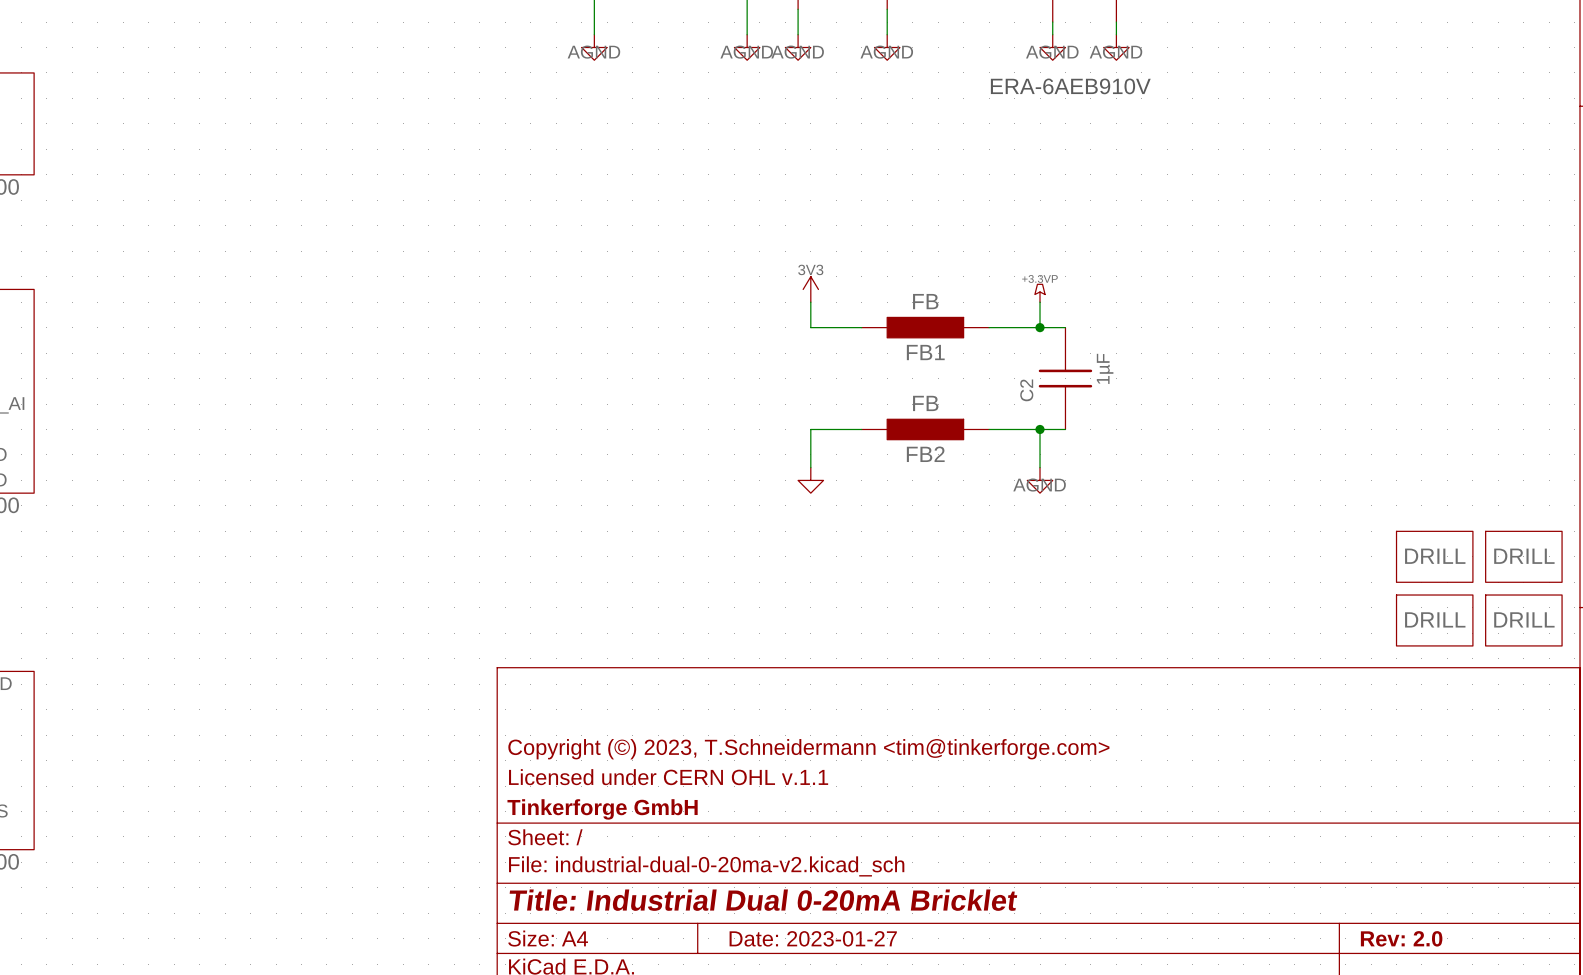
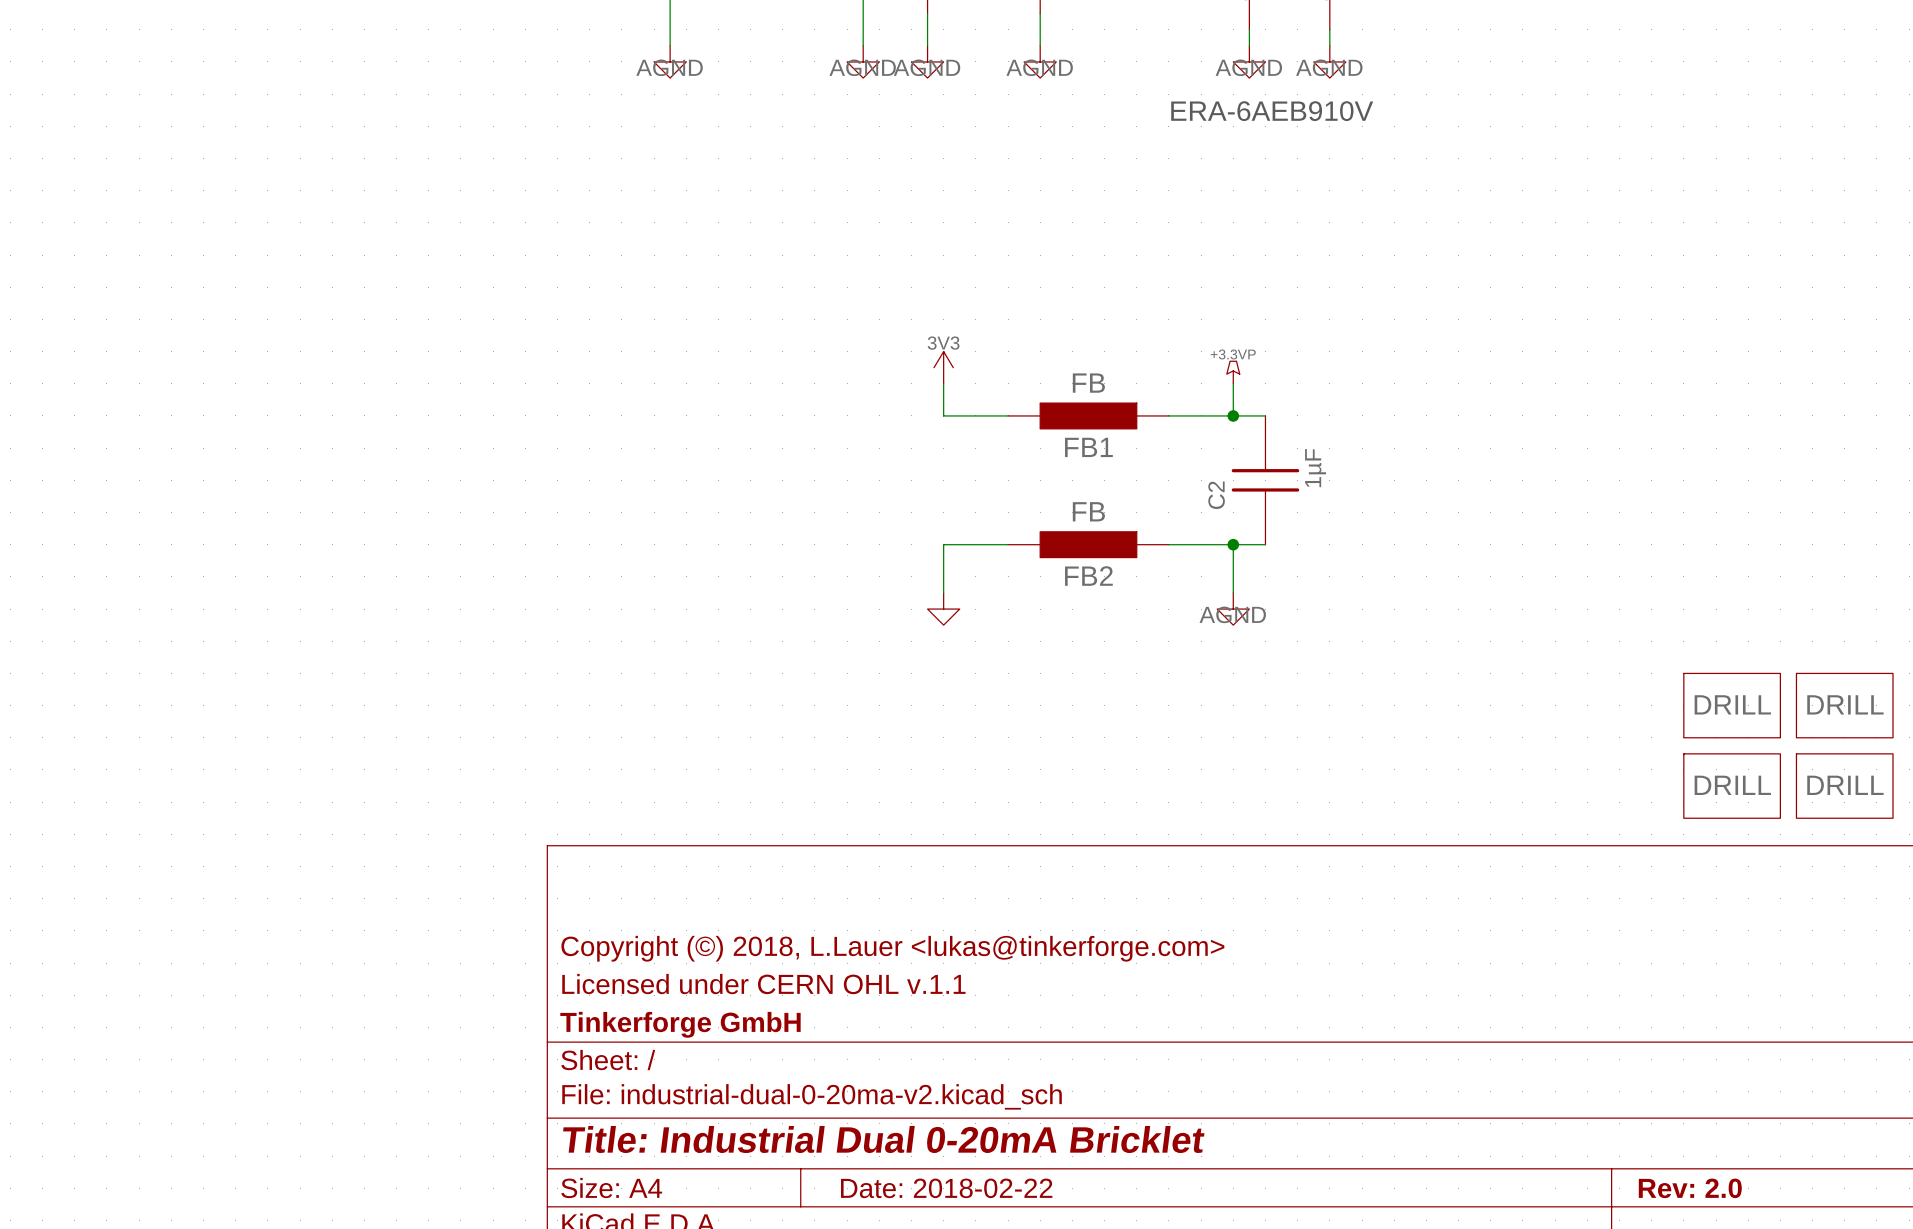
title block: Copyright (©) 2023, T.Schneidermann <tim@tinkerforge.com> (808, 749) -> Copyright (©) 2018, L.Lauer <lukas@tinkerforge.com> (892, 948)
title block: Date: 2023-01-27 (813, 938) -> Date: 2018-02-22 (946, 1188)

